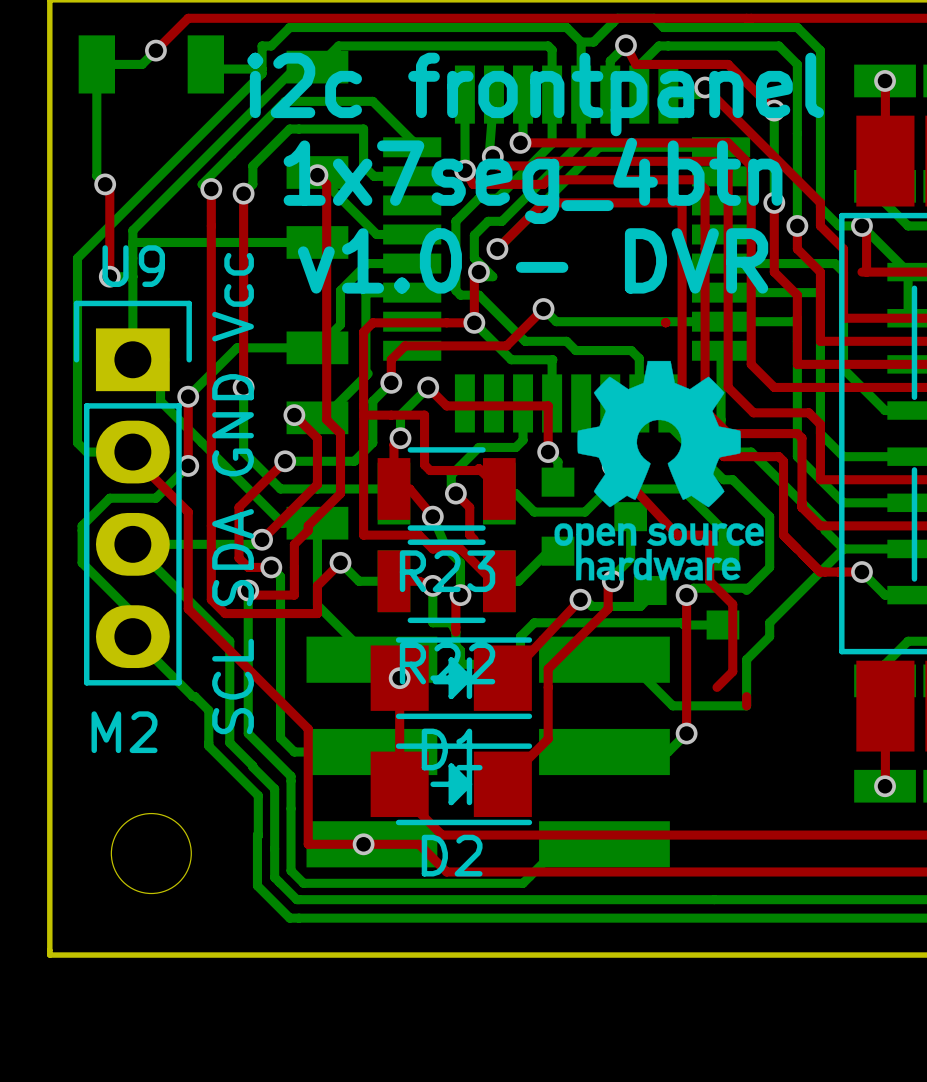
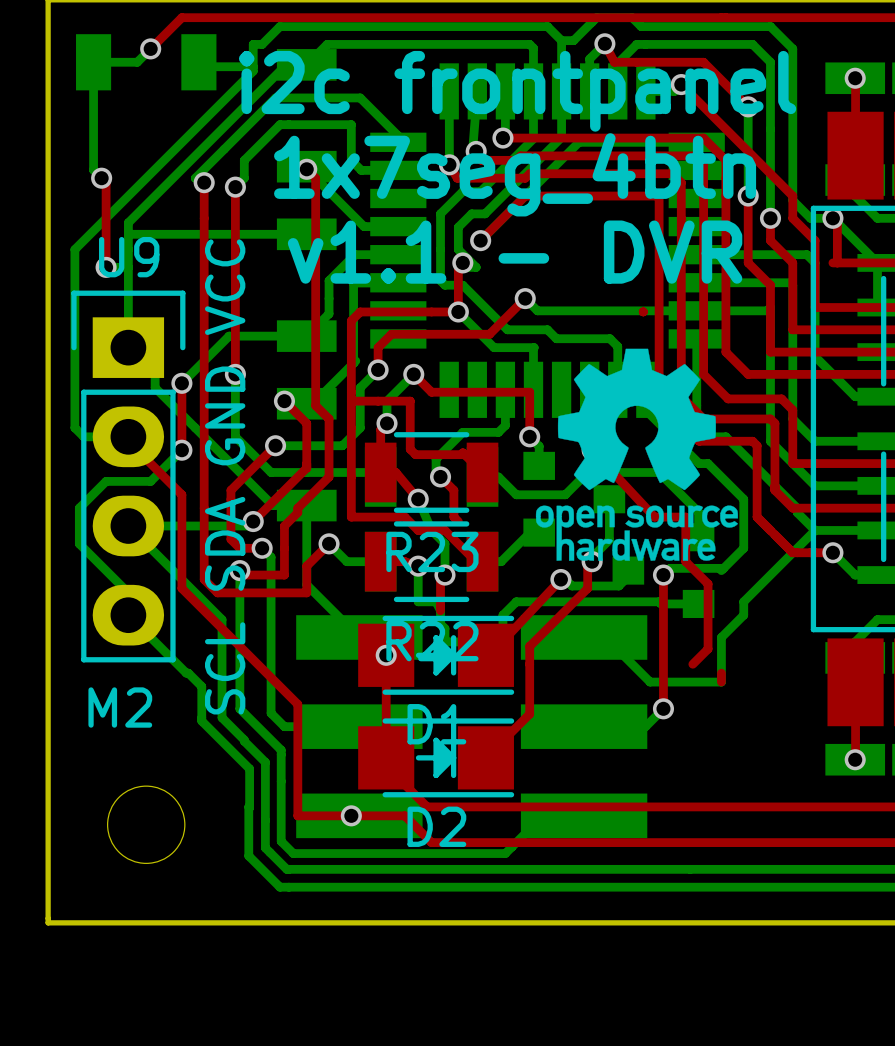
text: v1.0 - DVR (533, 260) -> v1.1 - DVR (515, 252)
U9 value: SCL SDA GND Vcc (233, 493) -> SCL SDA GND VCC (225, 476)

